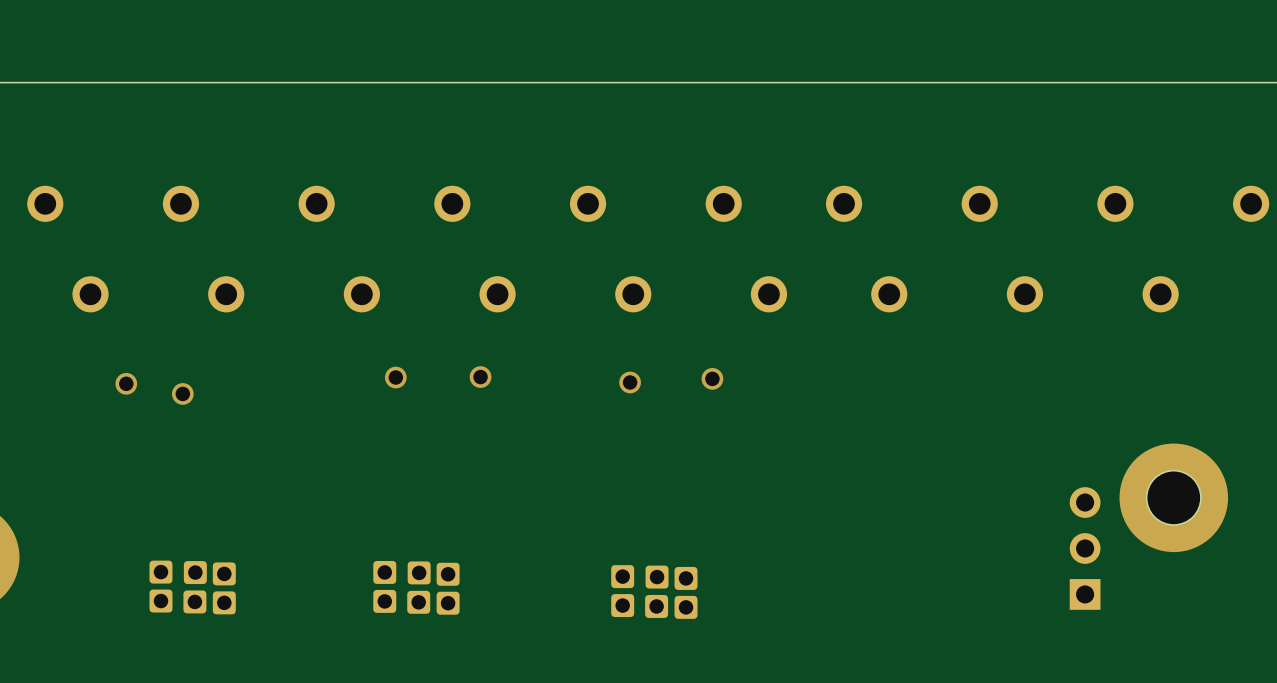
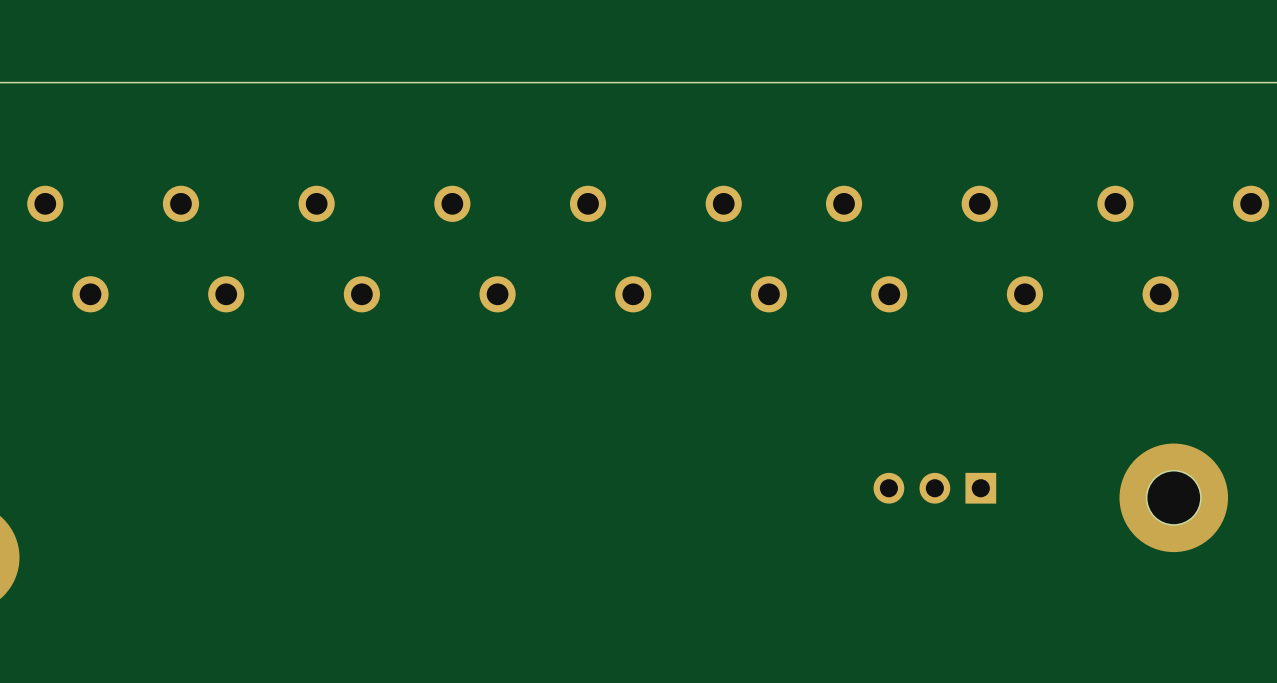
via: (395, 377) -> none
via: (480, 377) -> none
via: (712, 378) -> none
via: (630, 382) -> none
via: (126, 383) -> none
via: (182, 393) -> none
part rotation: 0° (1085, 548) -> 90° counterclockwise (934, 488)
part position: (1085, 548) -> (934, 488)
part: (192, 587) -> none
part: (416, 587) -> none
part: (654, 591) -> none

